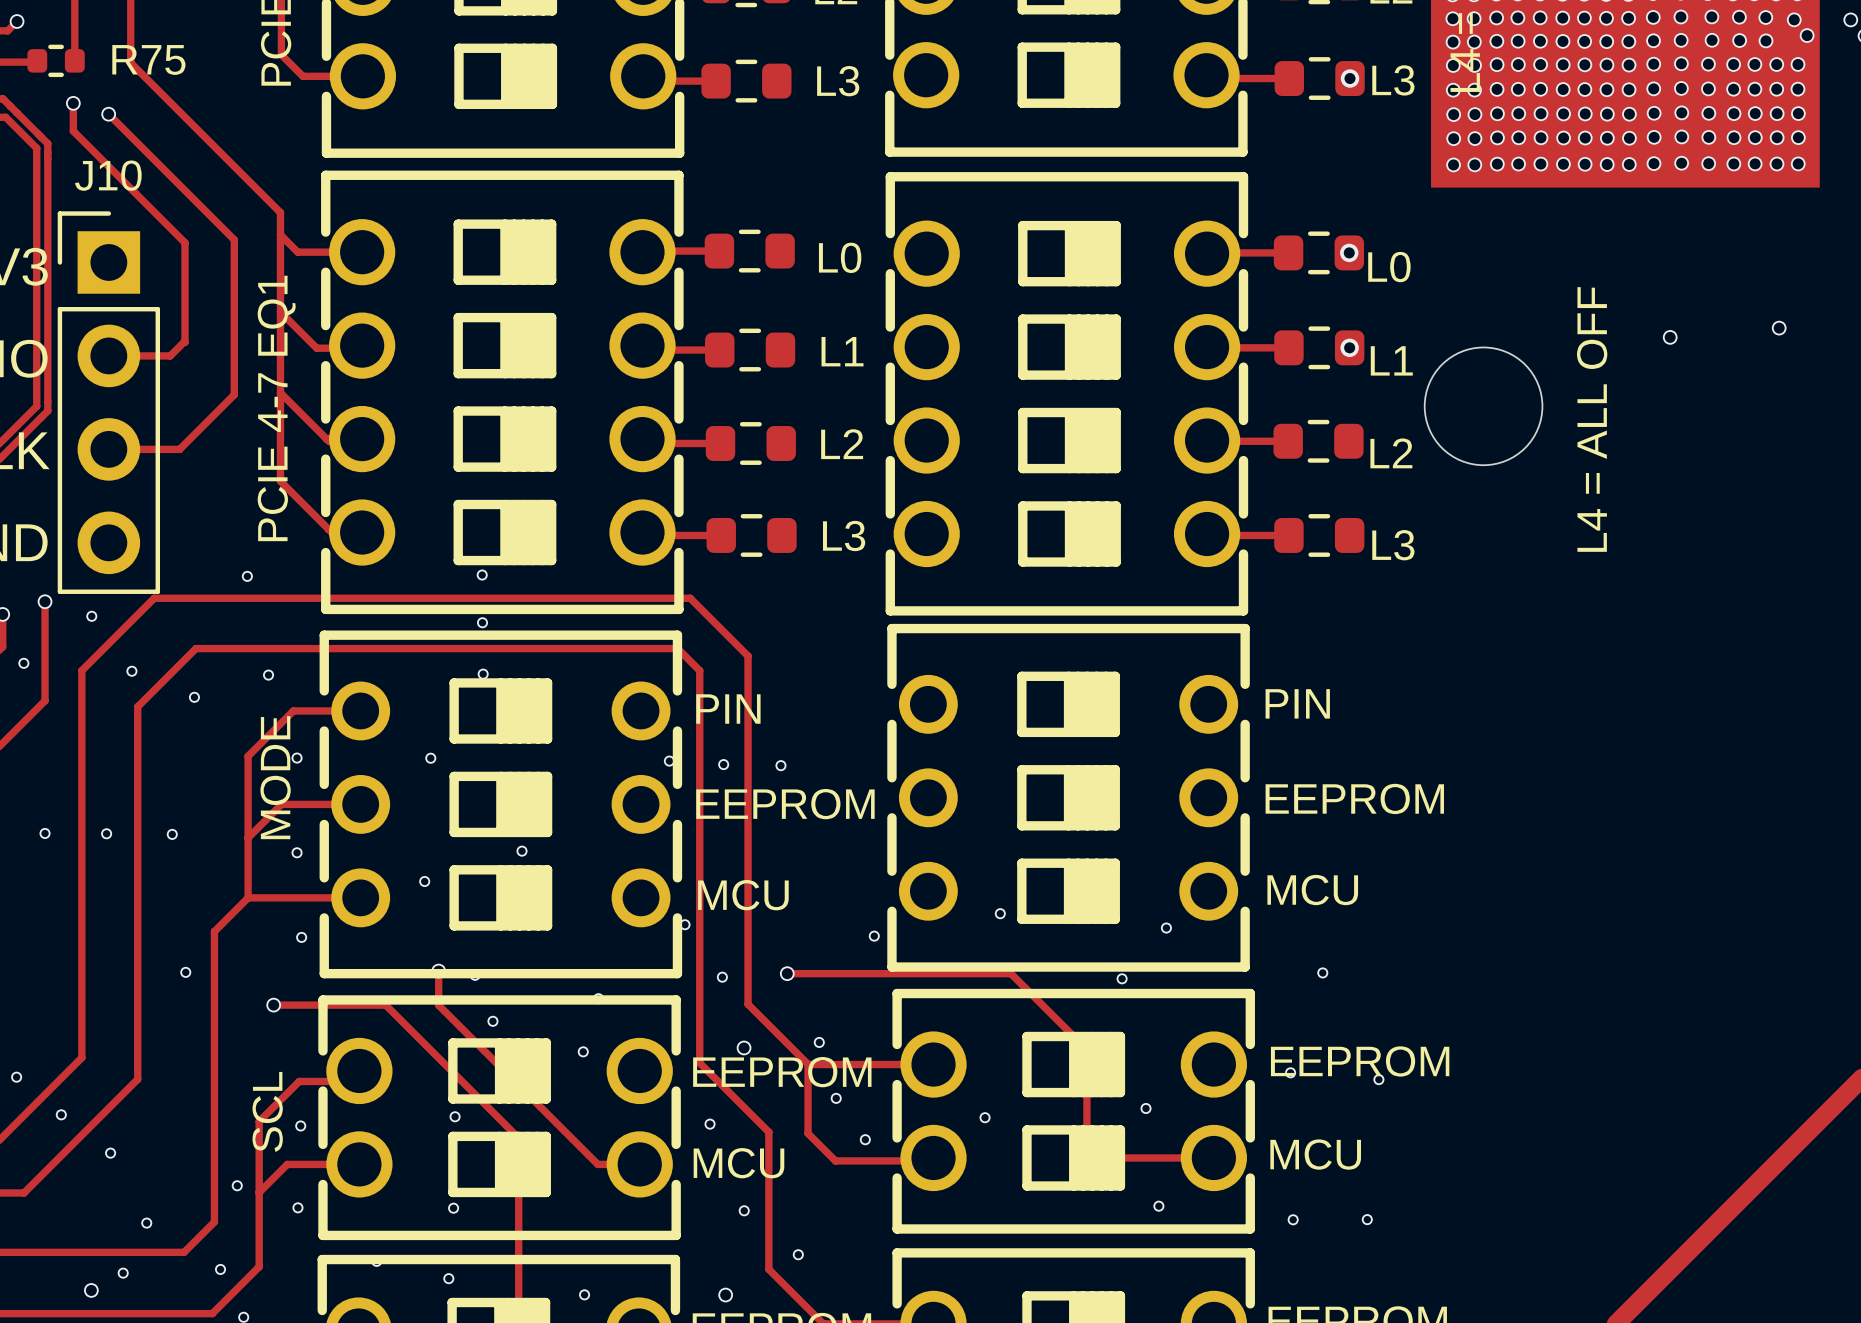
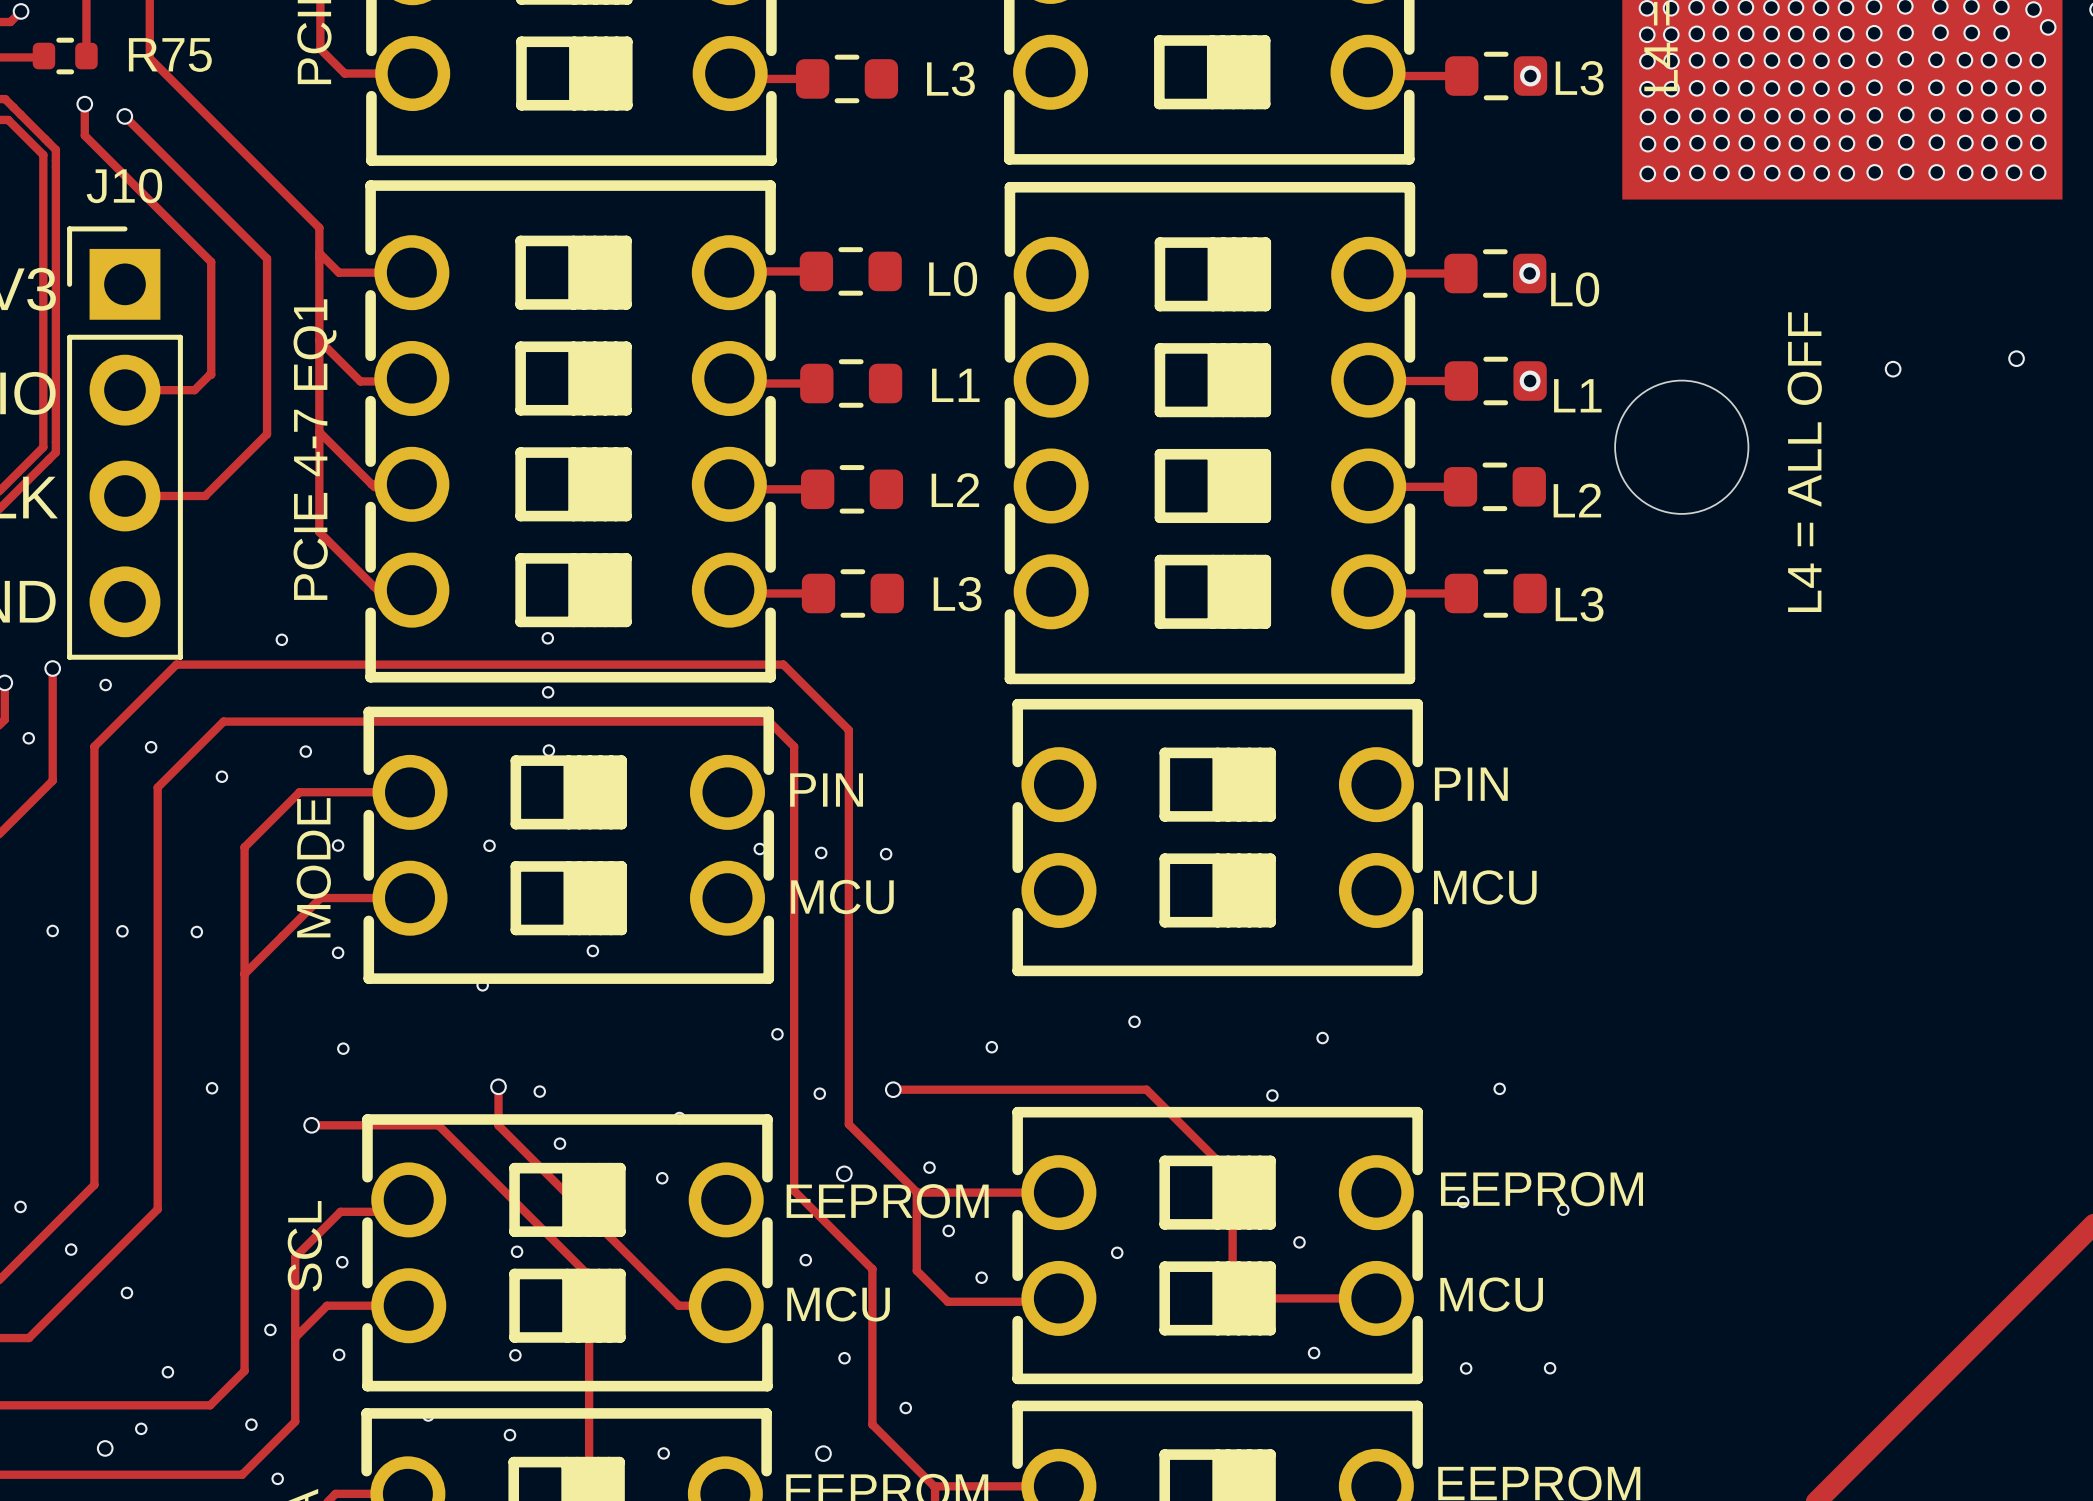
track: (293, 710) (248, 756) (248, 897) -> (333, 792) (299, 792) (244, 847) (244, 1042)
part: none -> (1217, 837)
part: none -> (568, 845)
part: (1068, 797) -> none
text: EEPROM (1354, 798) -> none
part: (500, 804) -> none
text: EEPROM (785, 804) -> MCU (842, 897)
text position: MCU (1312, 890) -> MCU (1485, 887)
text: MCU (743, 895) -> none
track: (248, 897) (214, 931) -> (282, 935) (244, 974)
track: (248, 897) (360, 897) -> none

